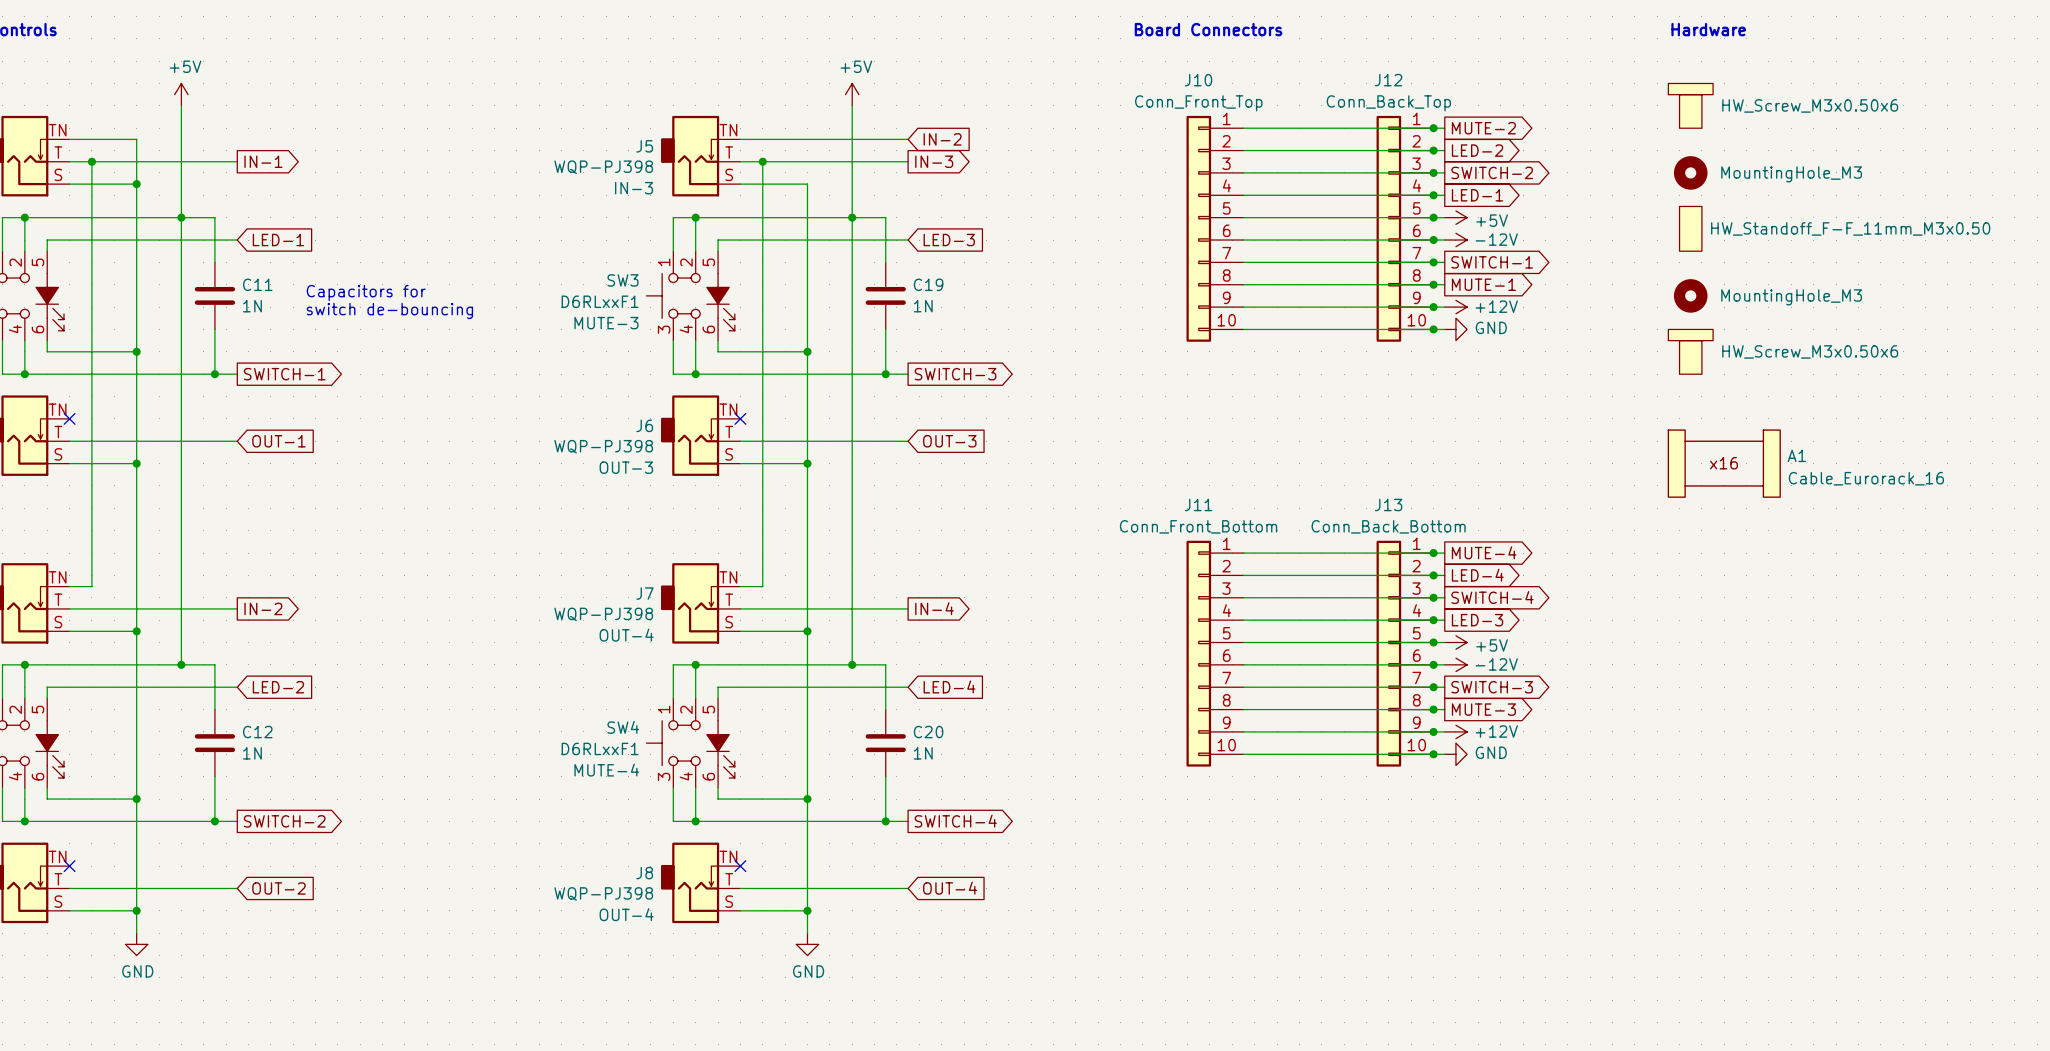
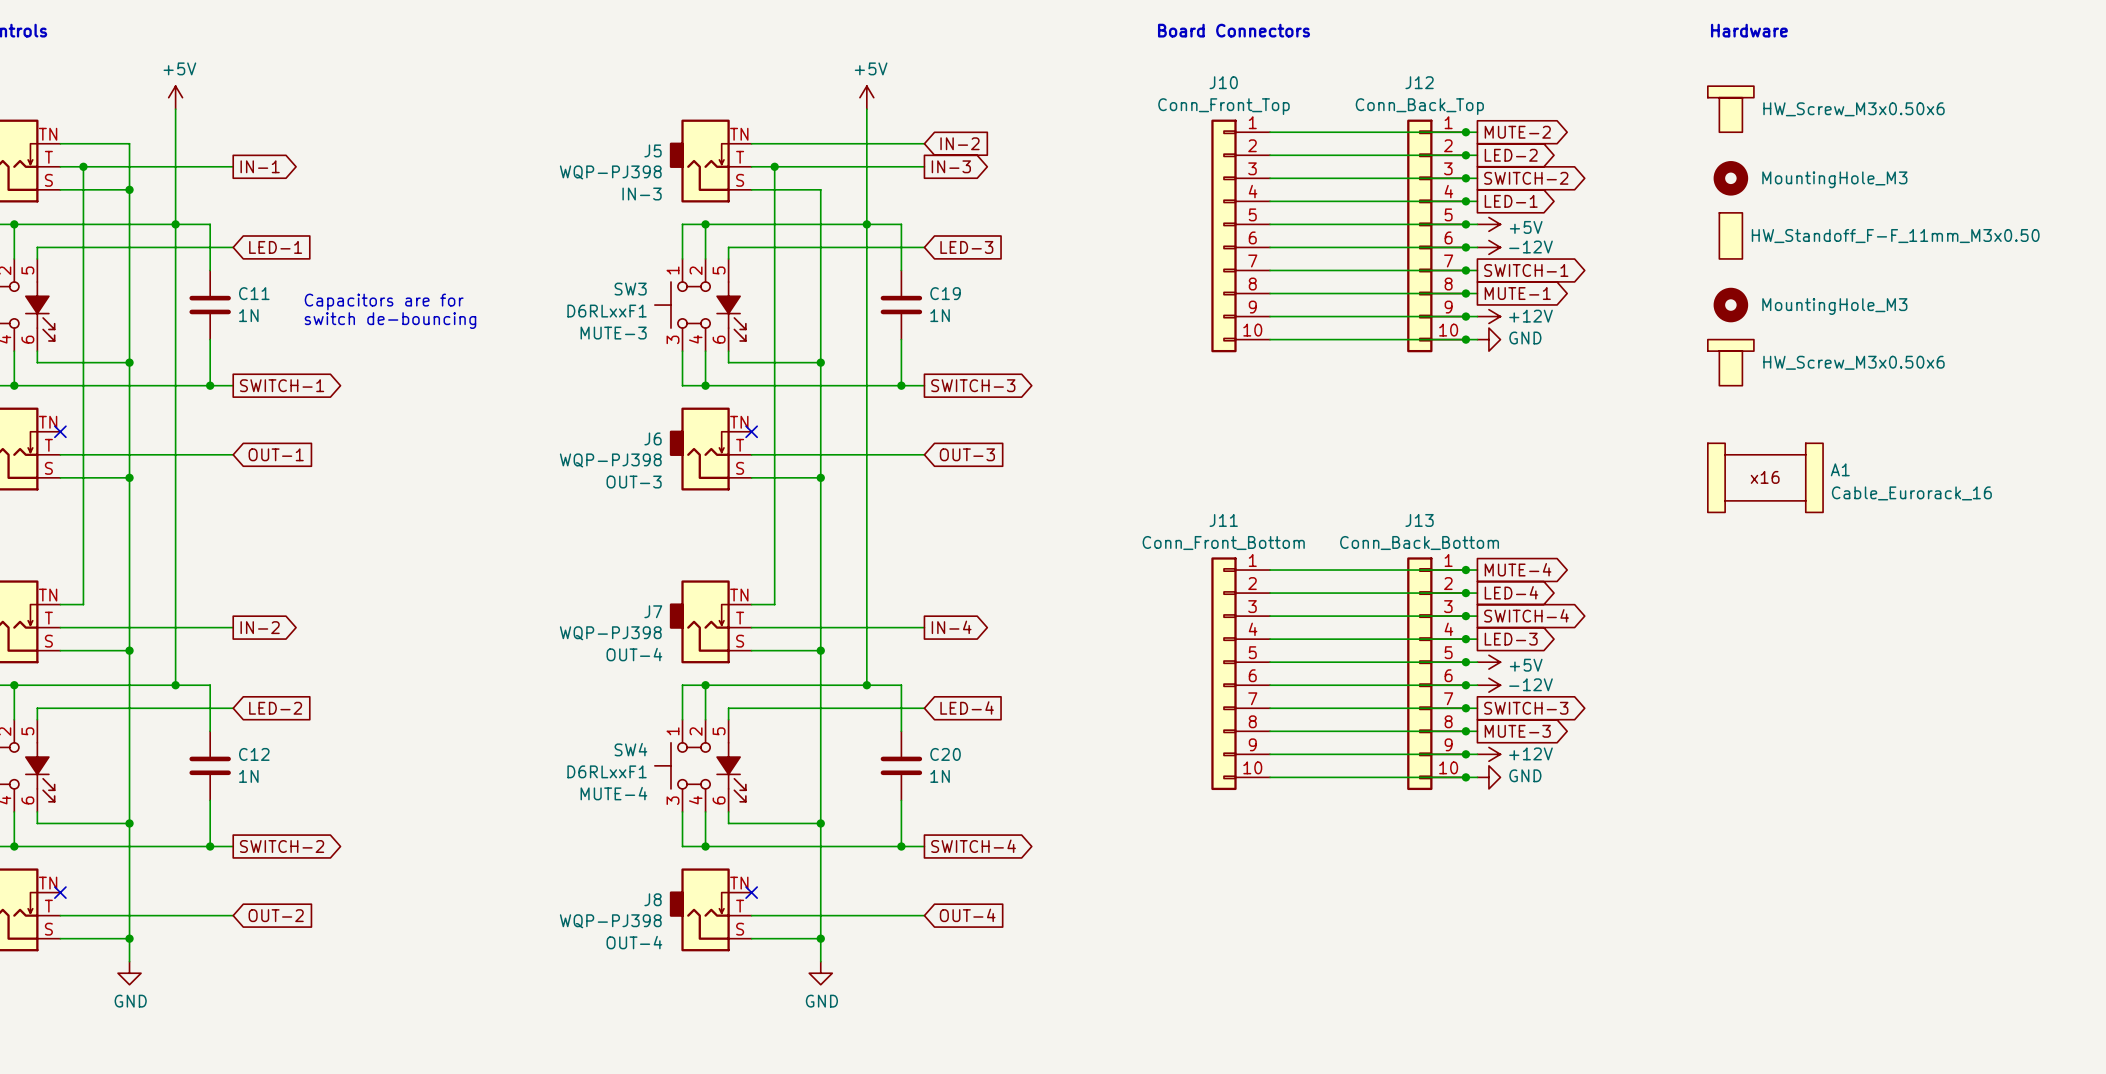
text: Capacitors for (366, 292) -> Capacitors are for (384, 302)

